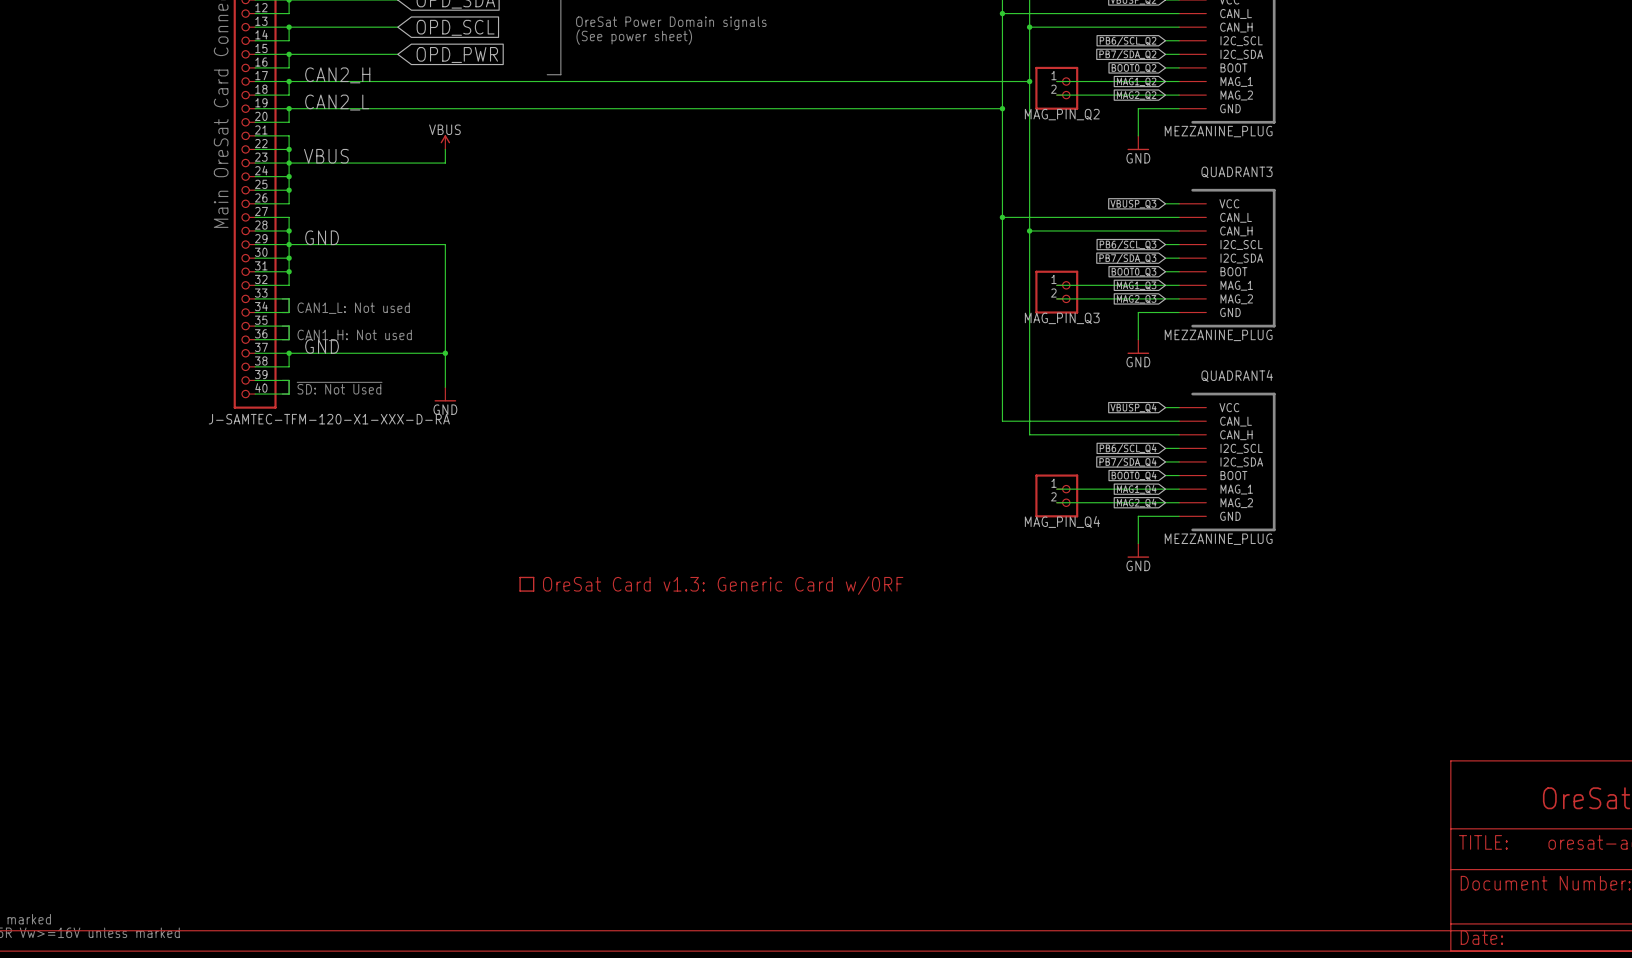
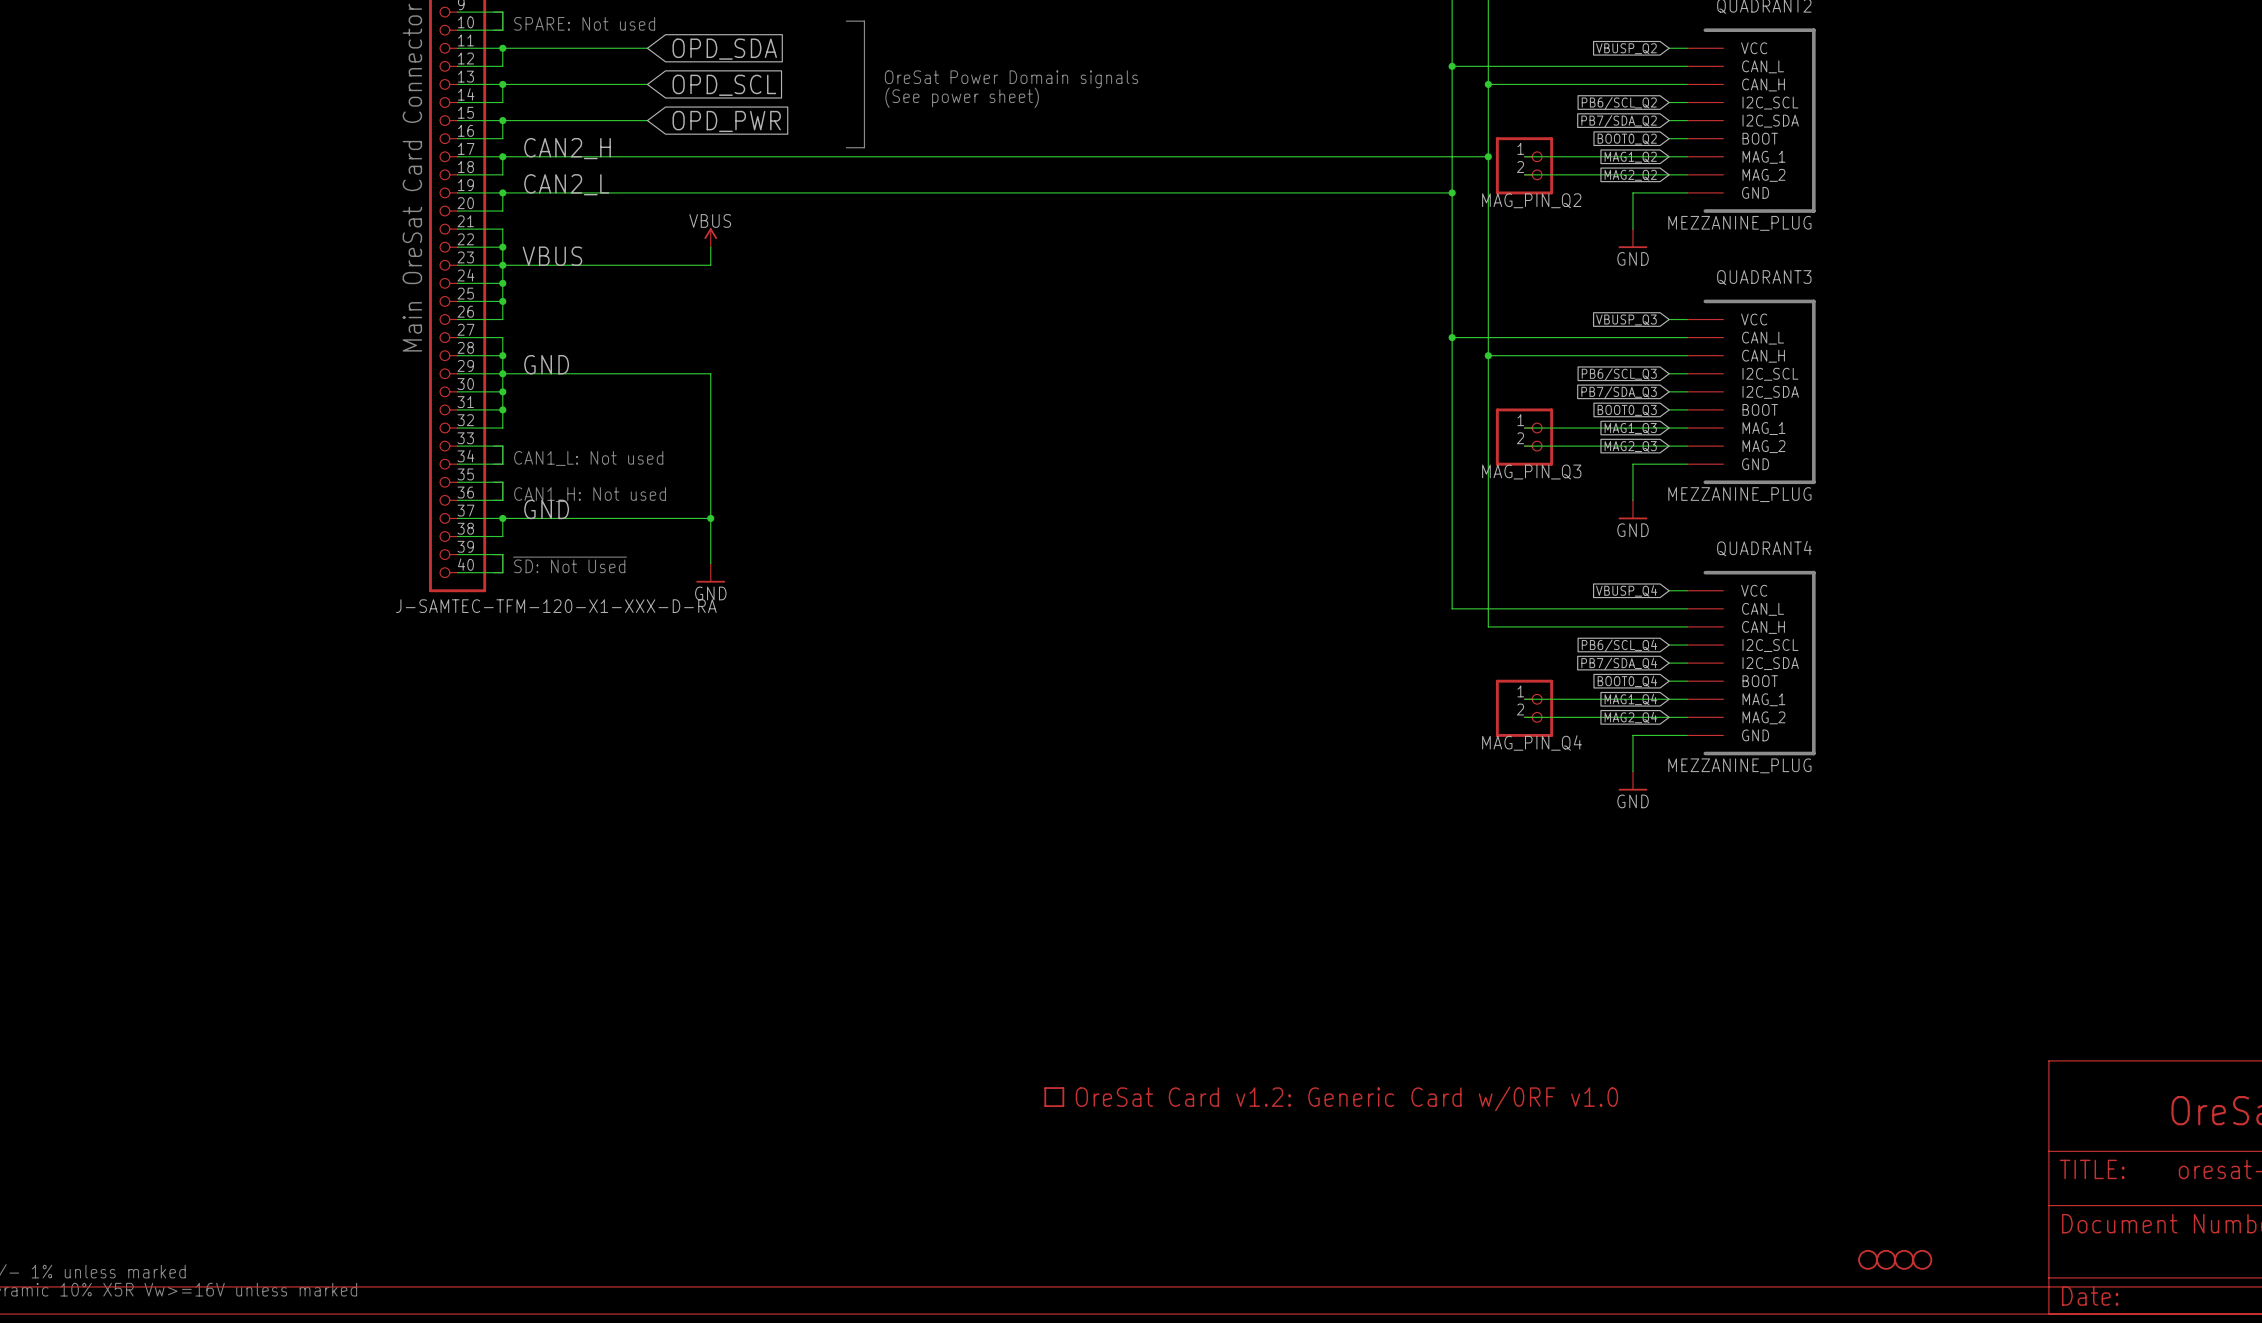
part: (526, 584) -> none
part: none -> (1054, 1097)
part: none -> (1868, 1259)
part: none -> (1886, 1259)
part: none -> (1904, 1259)
part: none -> (1922, 1259)

